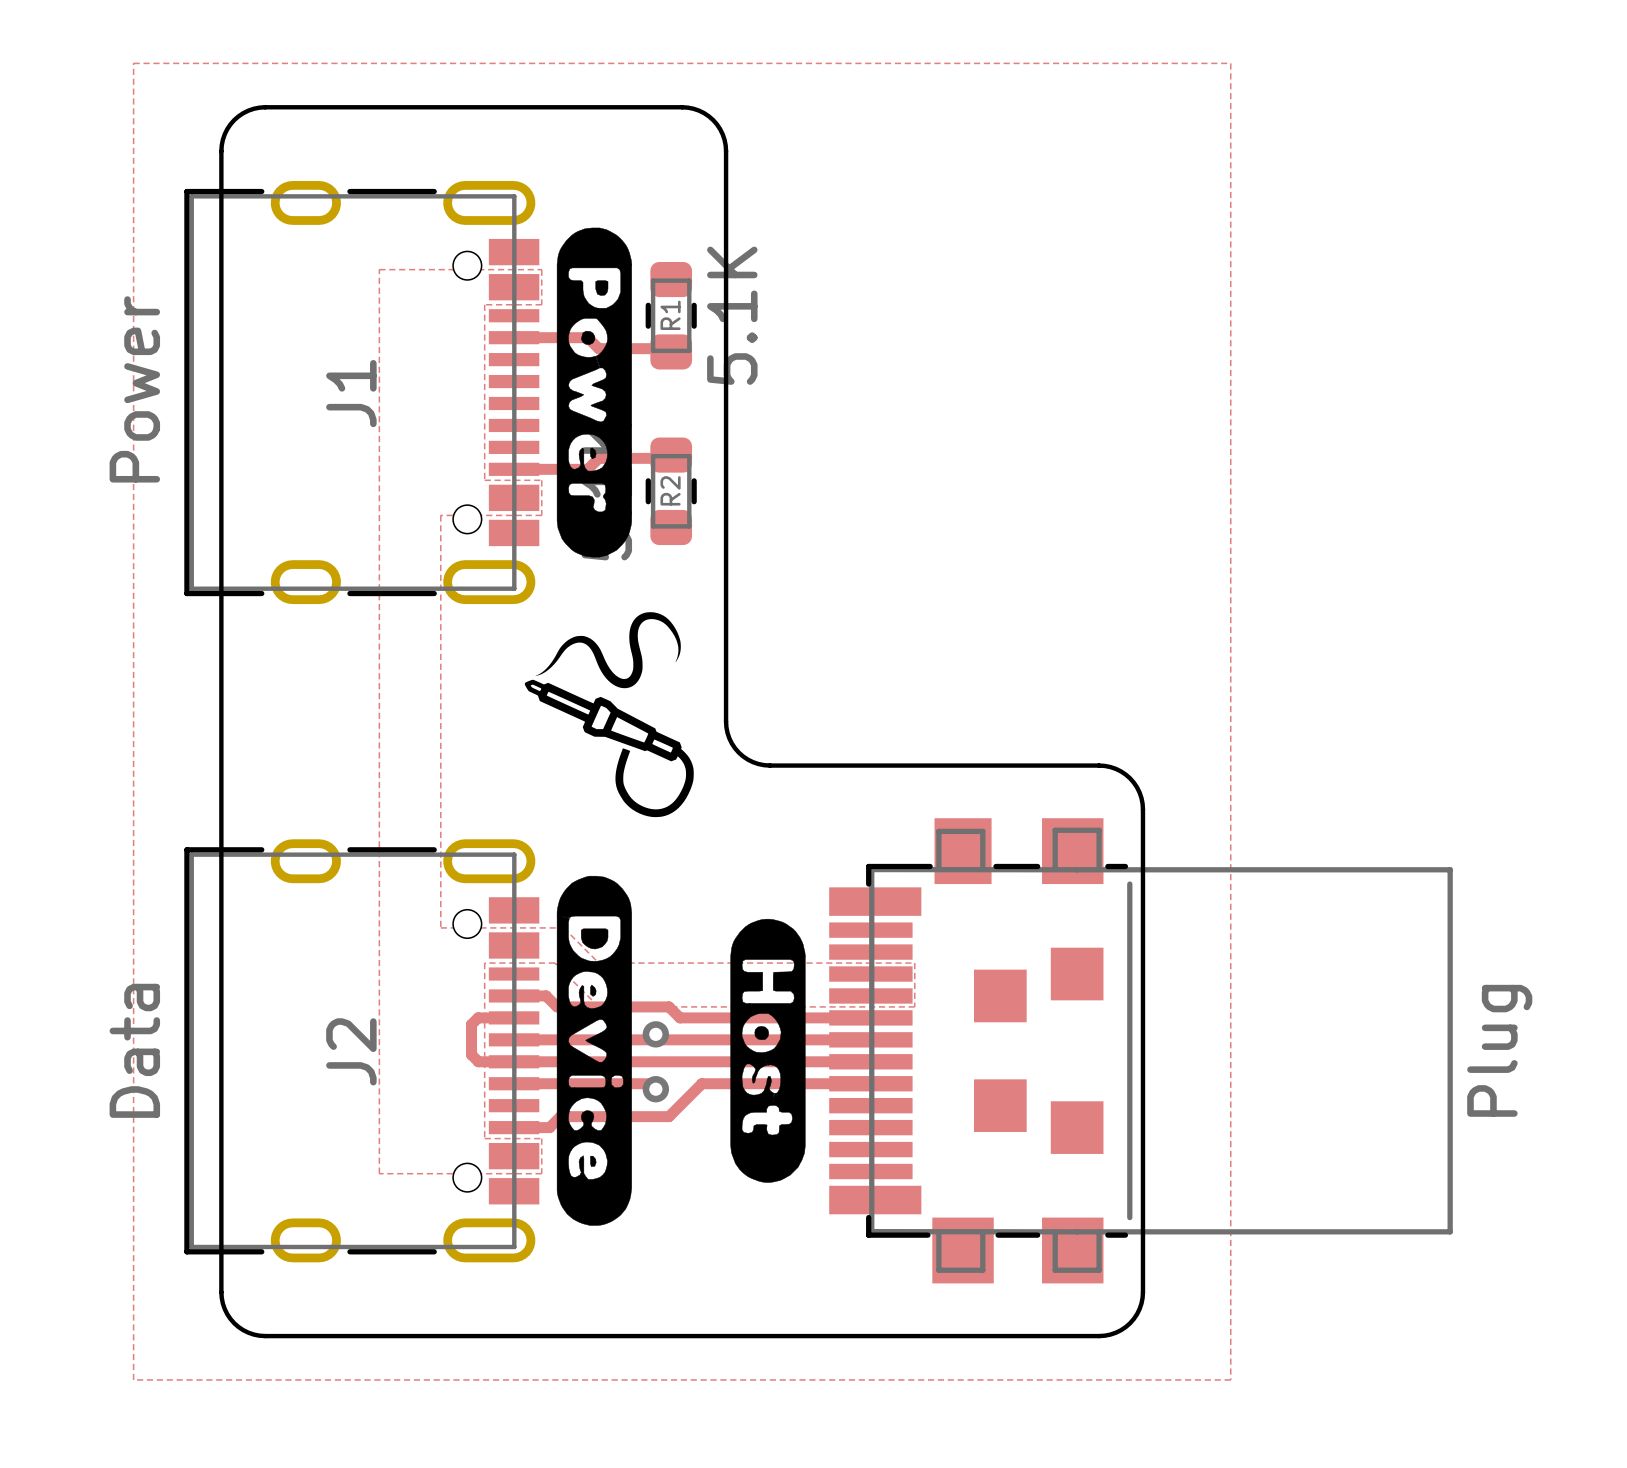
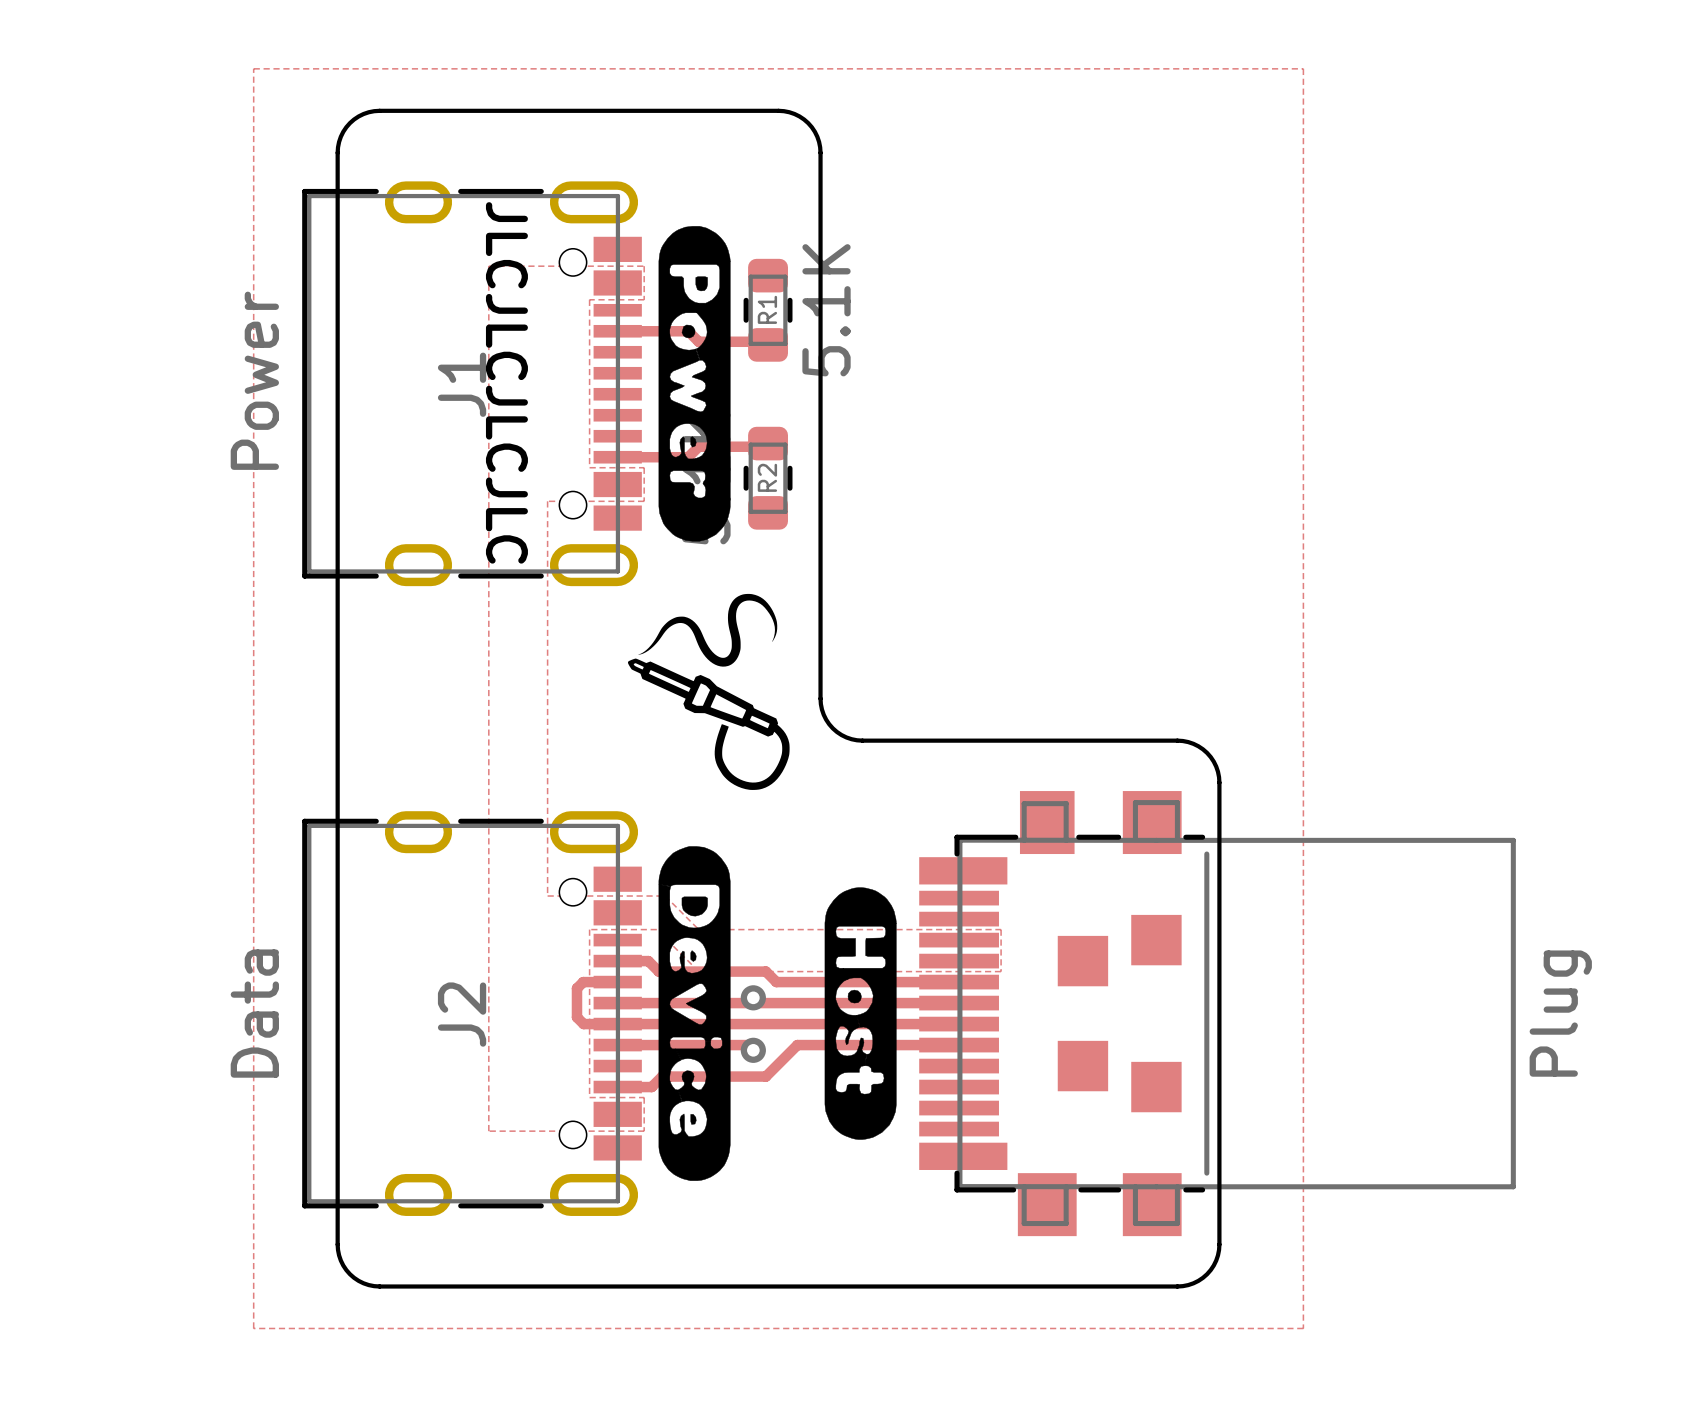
text: none -> JLCJLCJLCJLC (506, 382)

